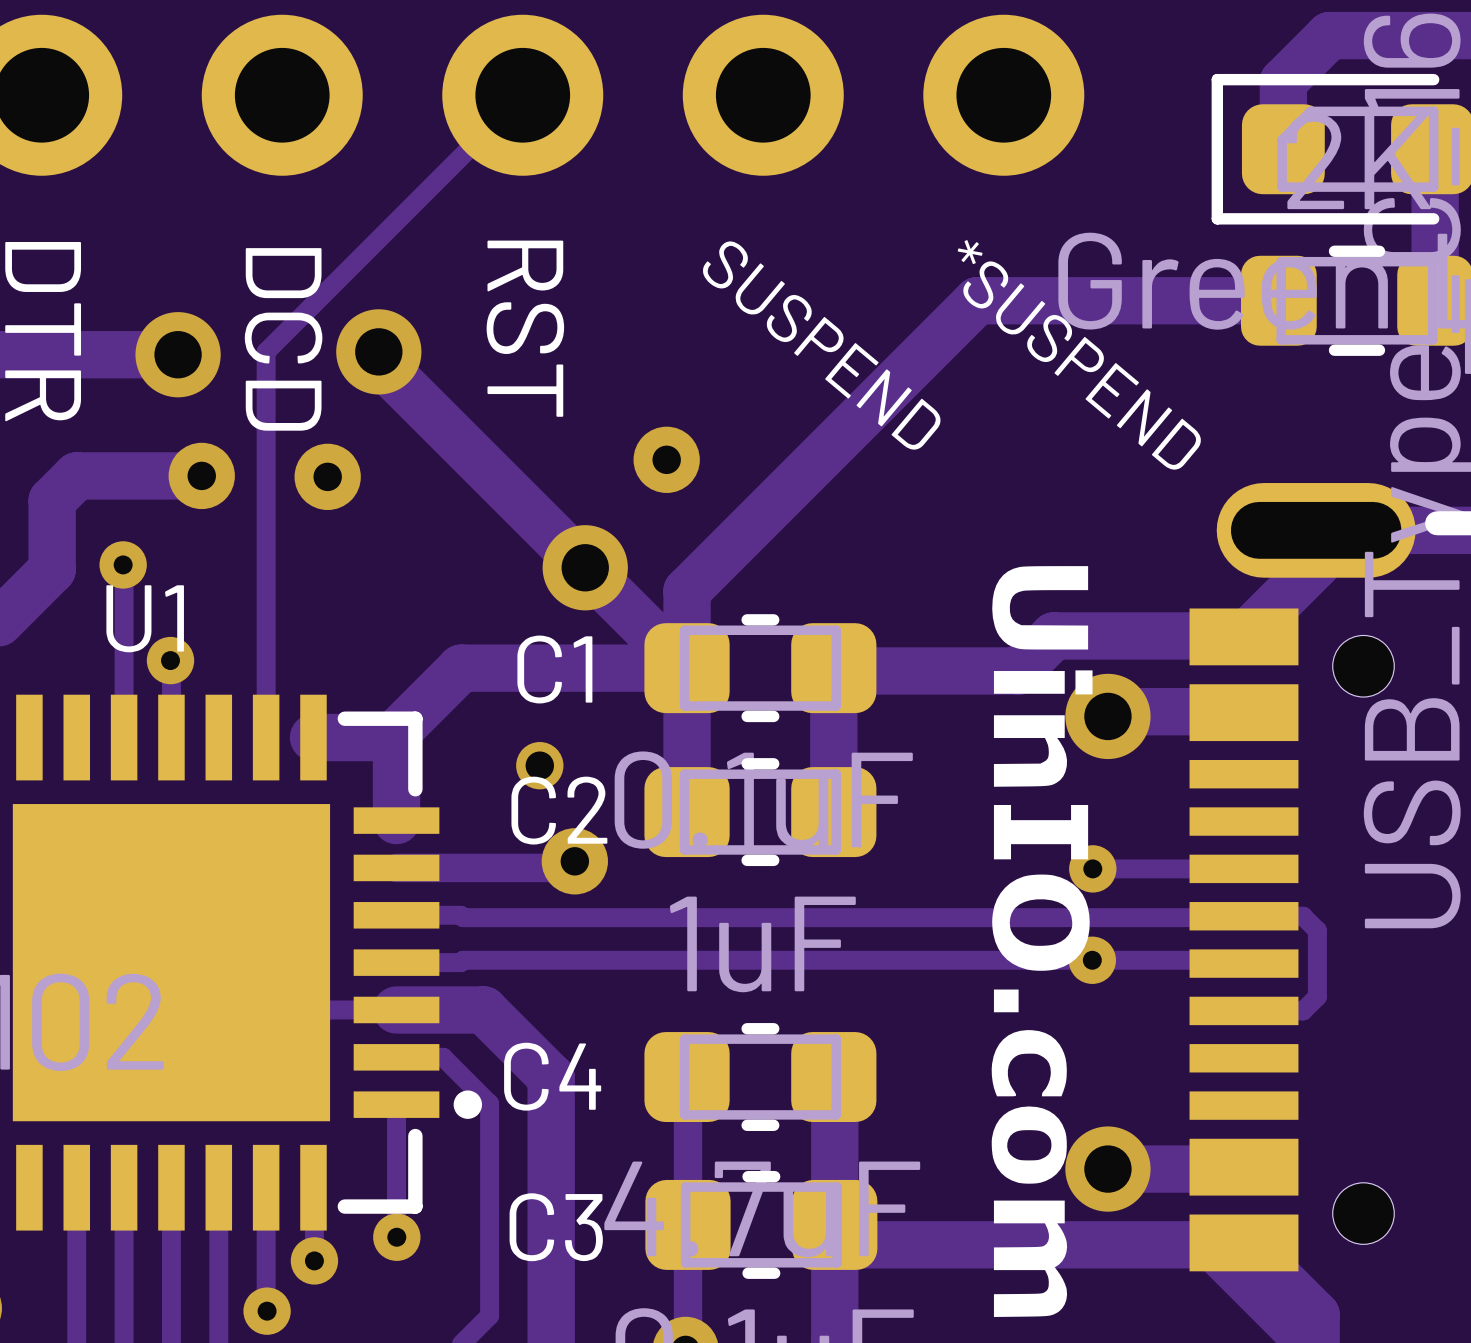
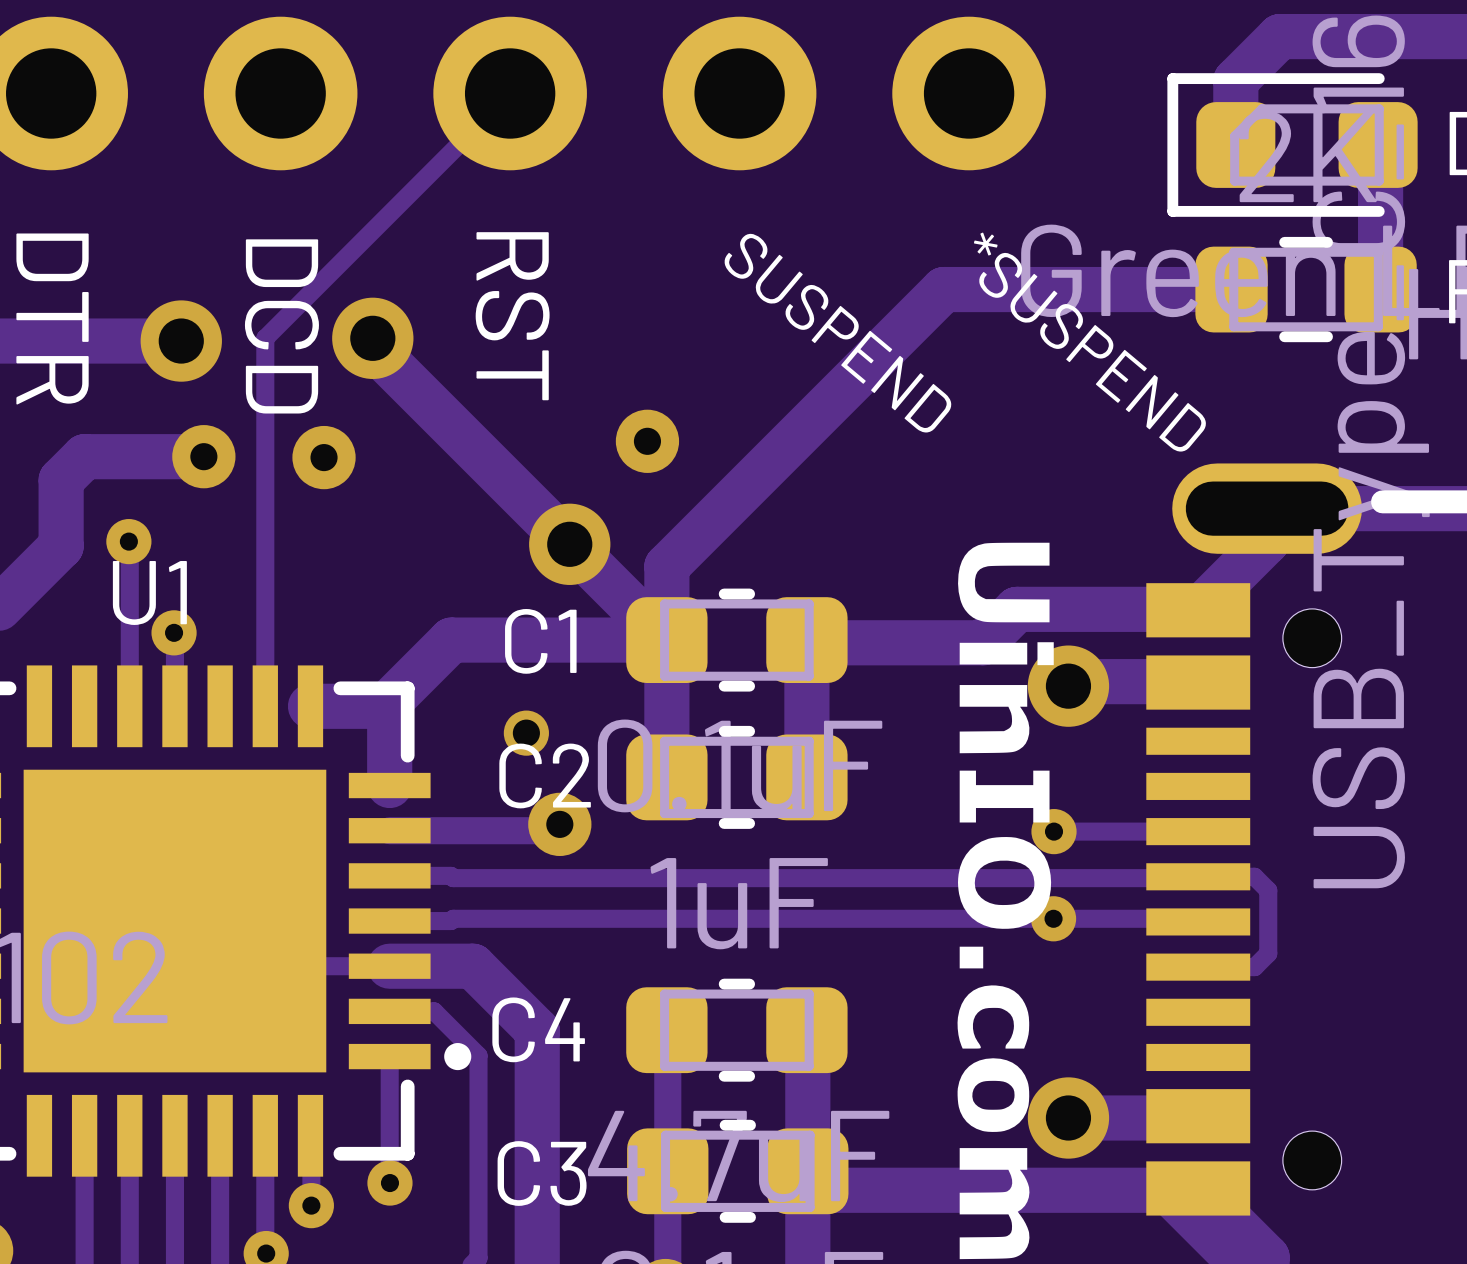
text position: SUSPEND (821, 345) -> SUSPEND (837, 333)
text position: *SUSPEND (1079, 354) -> *SUSPEND (1090, 342)

